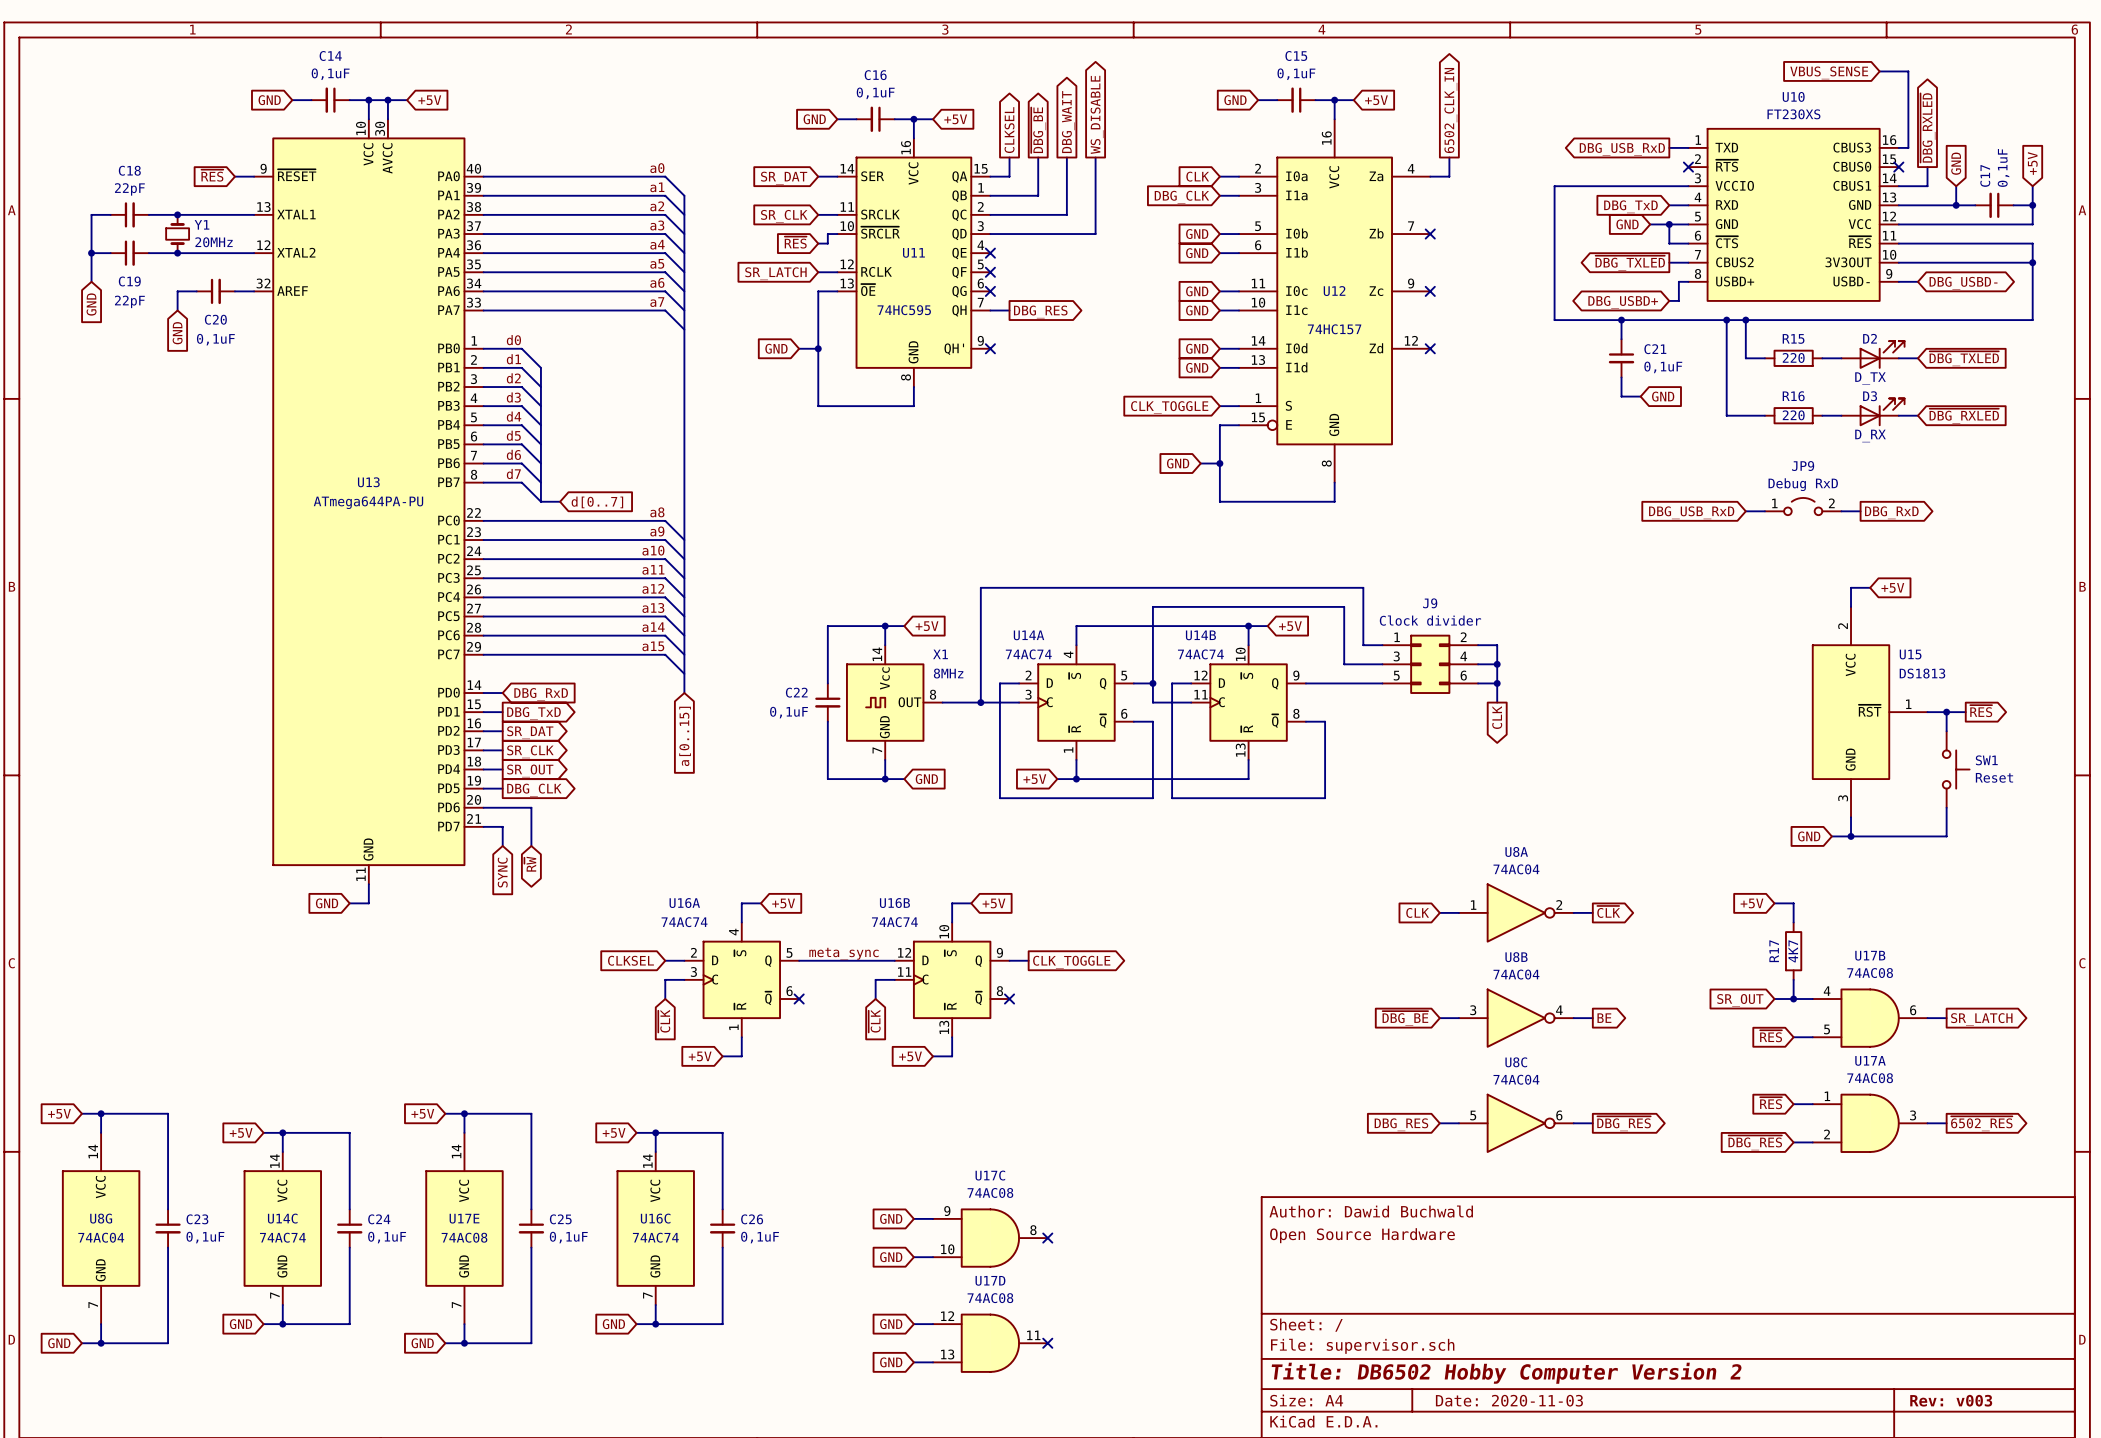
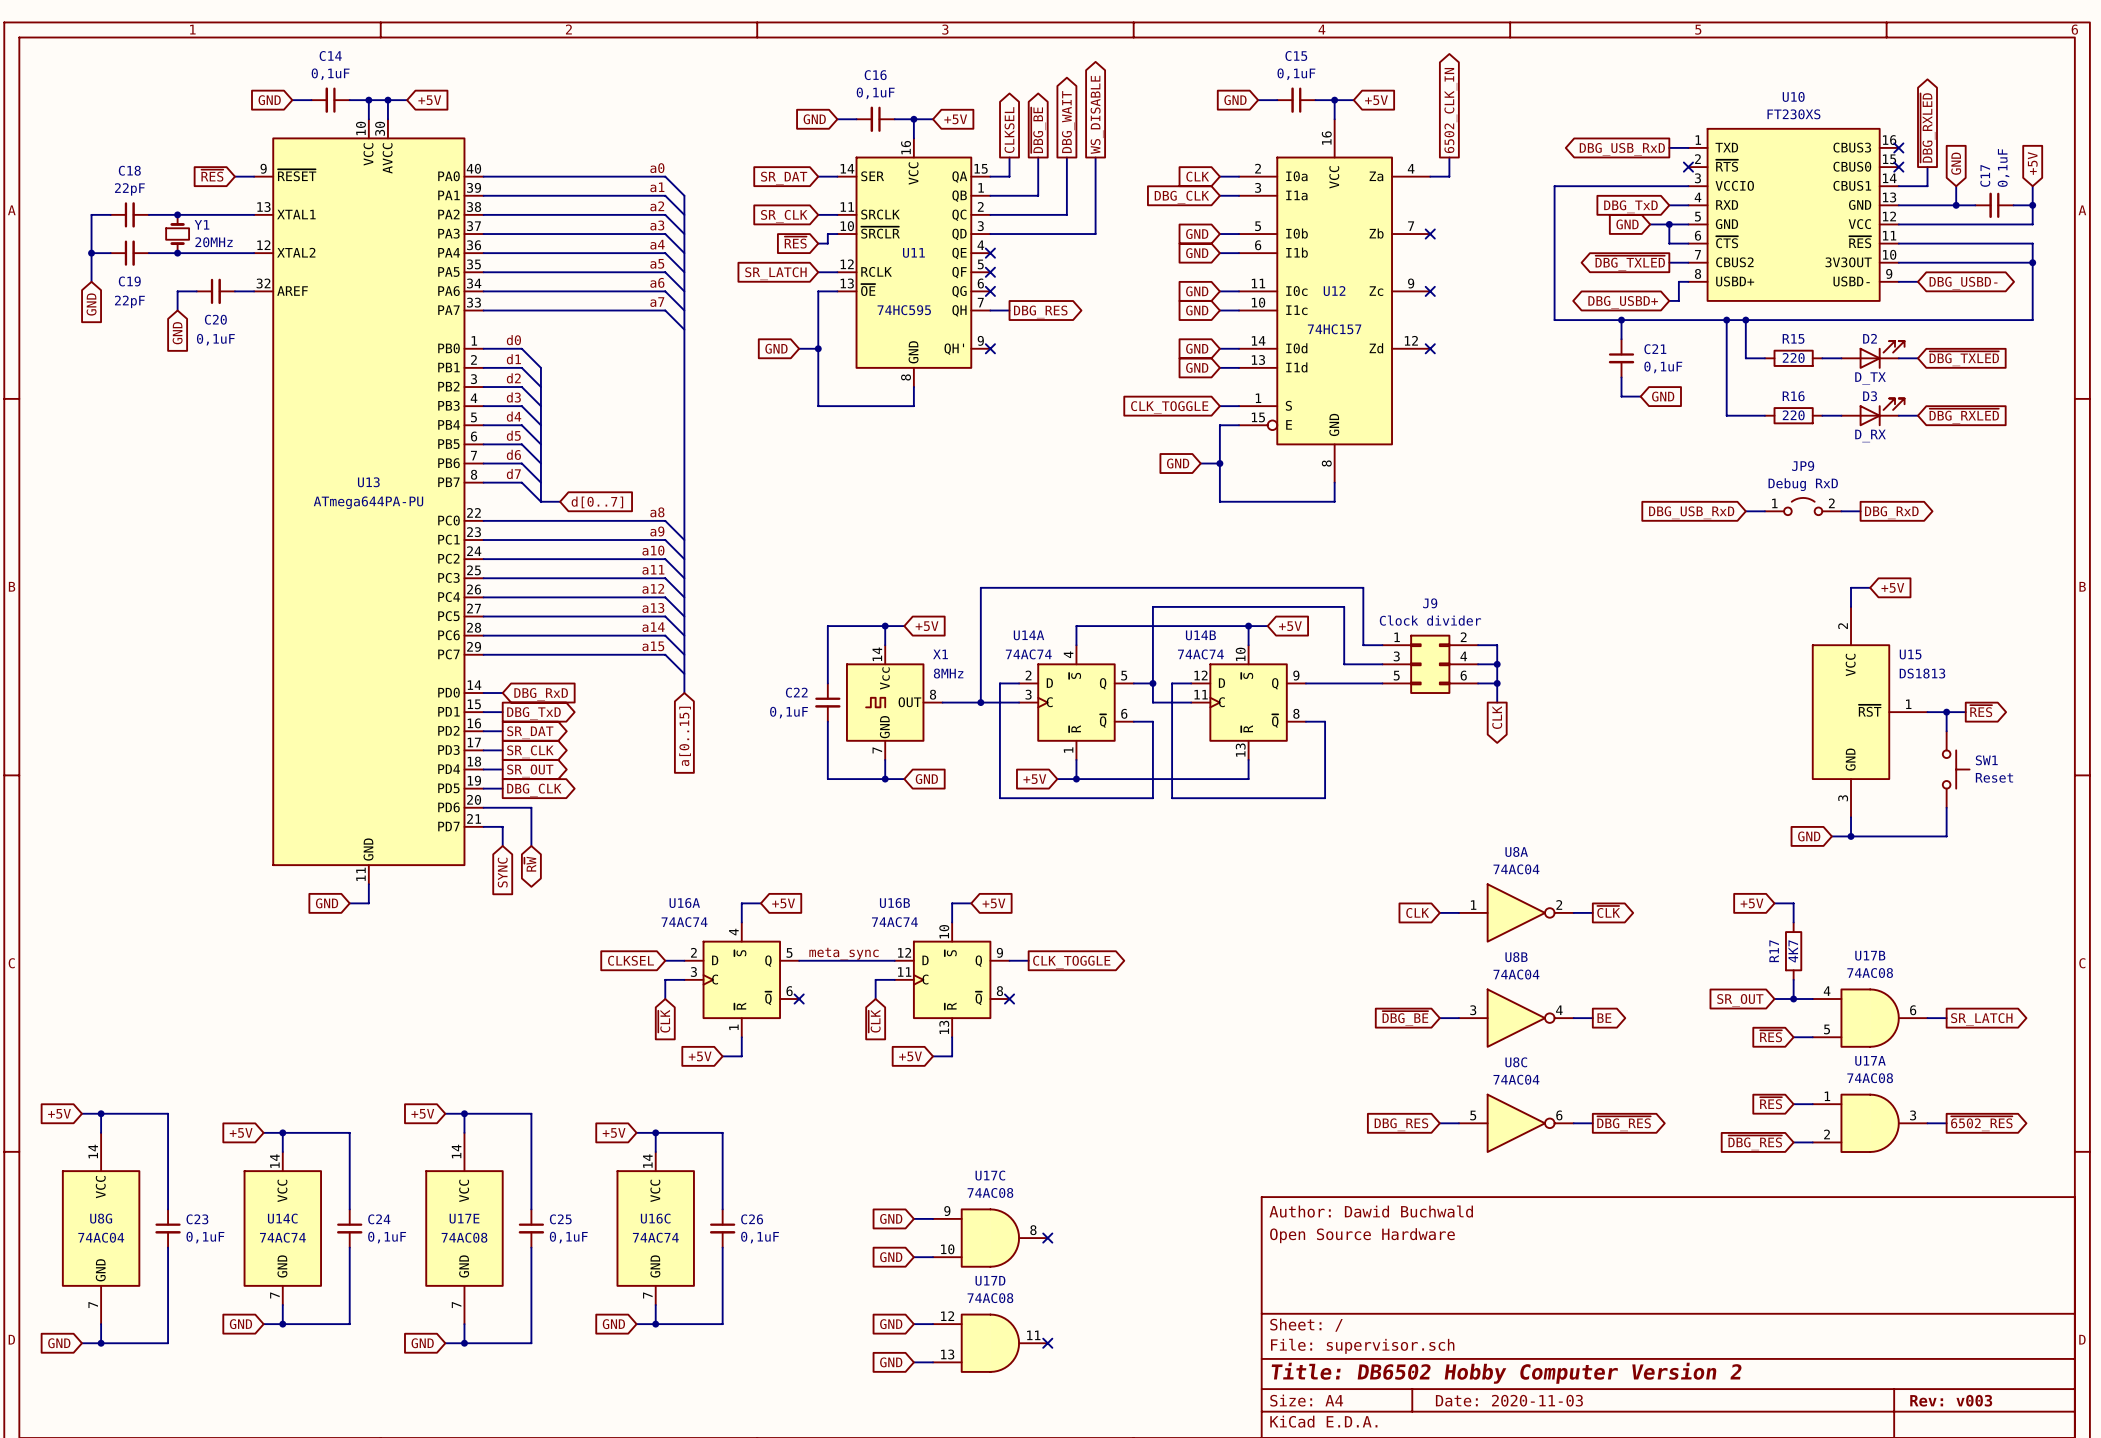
wire: (1879, 71) (1908, 71) (1908, 147) (1898, 147) -> none
global label: VBUS_SENSE (1829, 72) -> none
no-connect mark: none -> (1898, 147)

